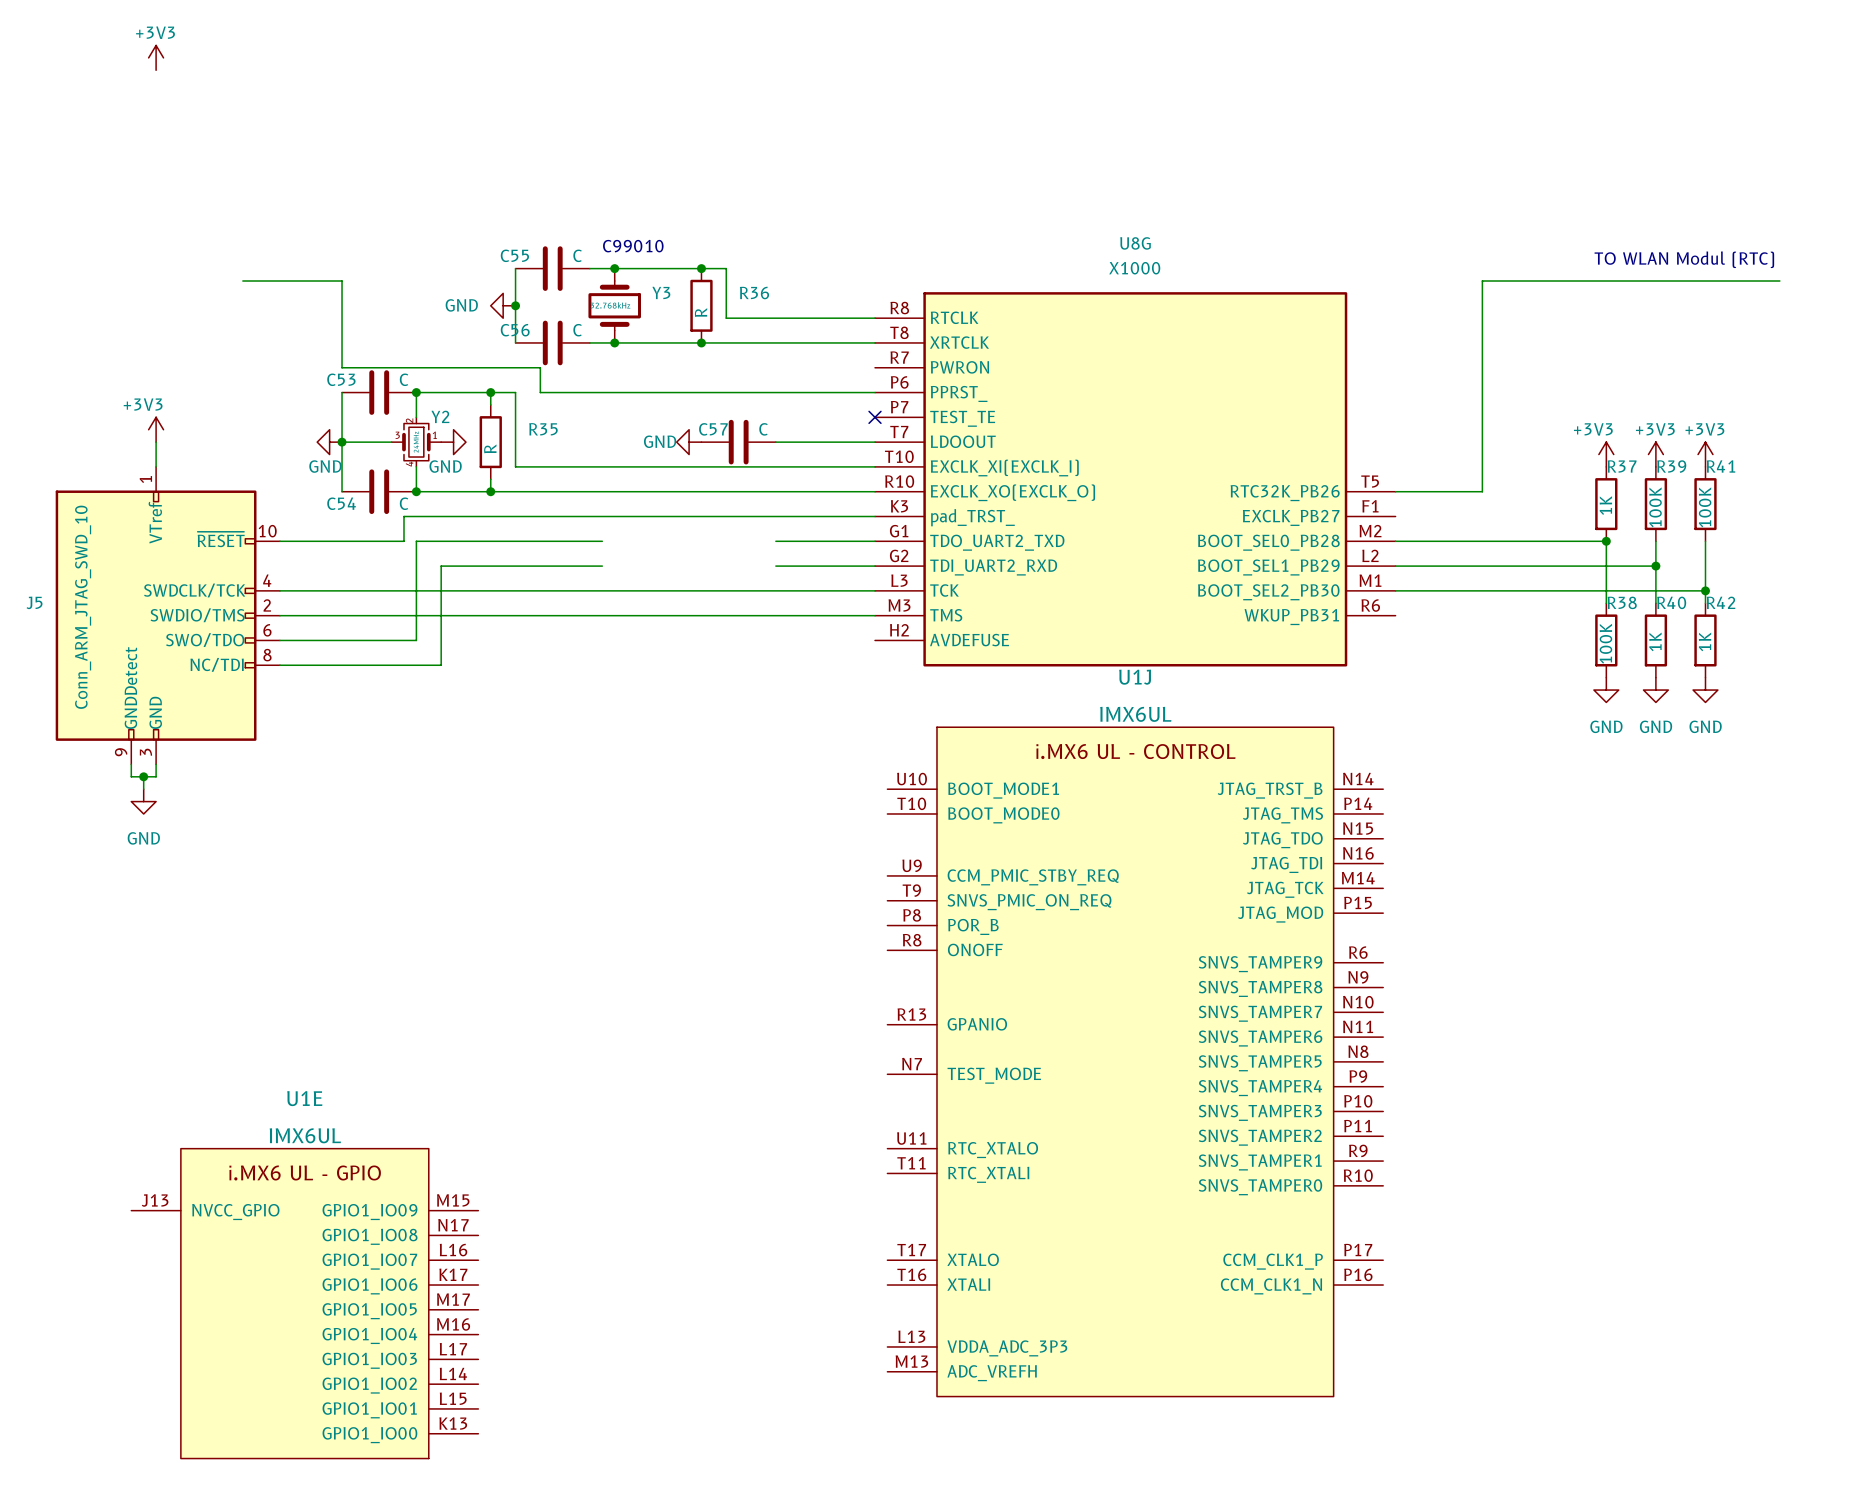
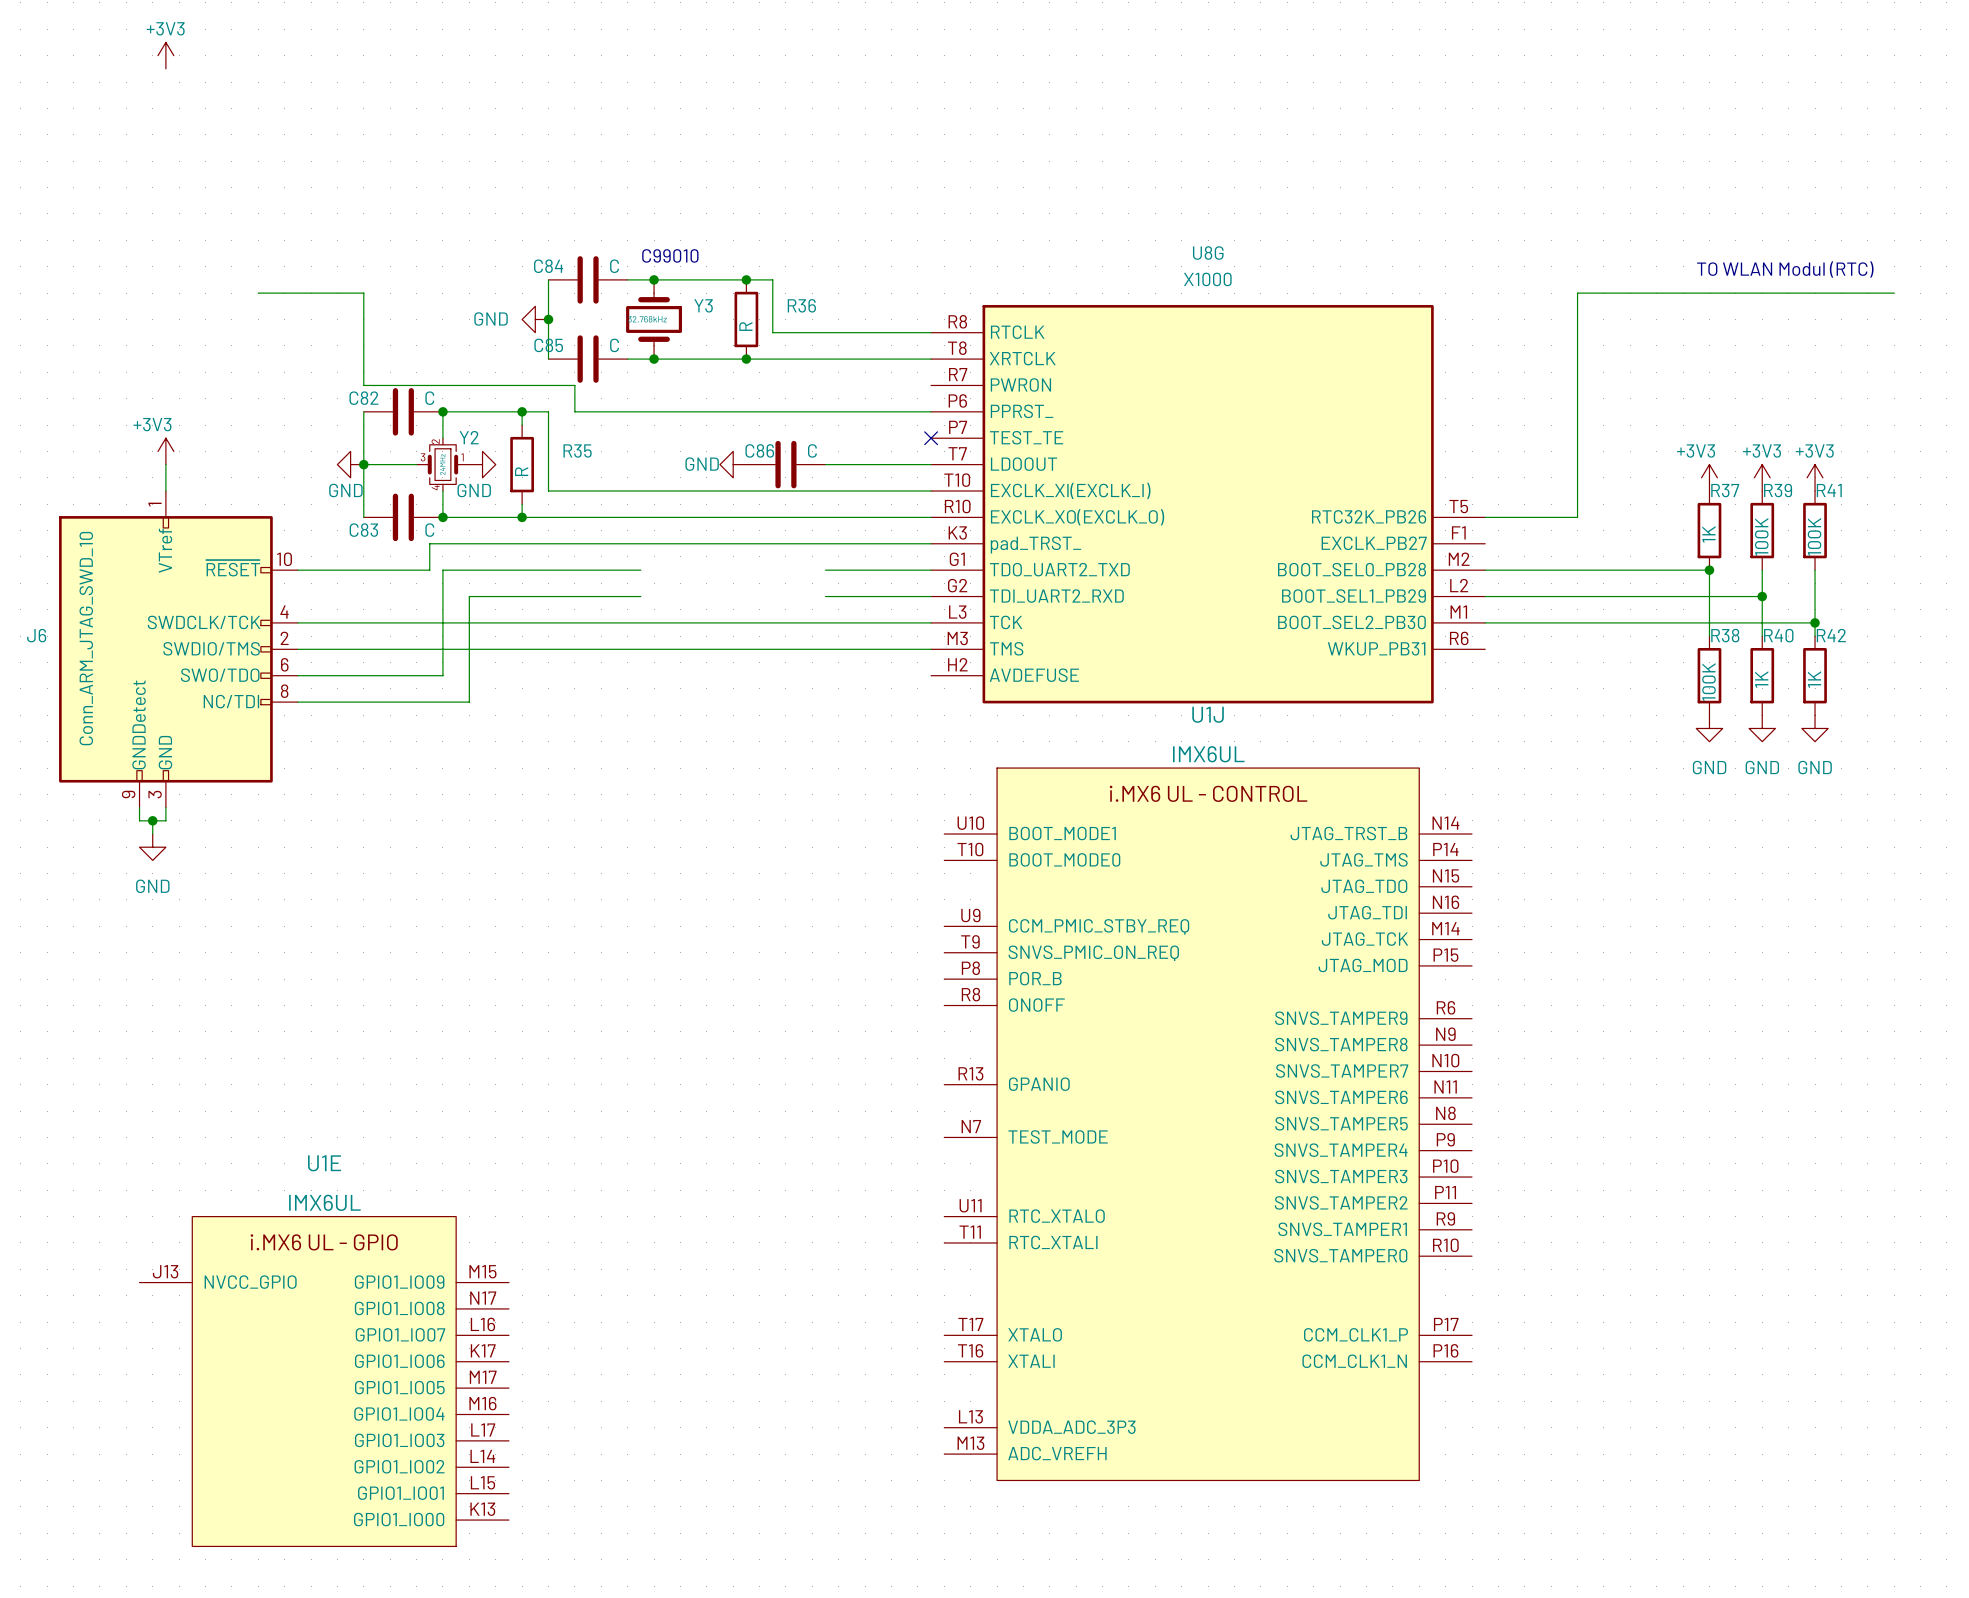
C55 name: C55 (514, 255) -> C84 (548, 266)
C56 name: C56 (515, 330) -> C85 (548, 345)
C53 name: C53 (341, 379) -> C82 (363, 398)
C57 name: C57 (713, 429) -> C86 (759, 450)
C54 name: C54 (341, 503) -> C83 (363, 530)
J5 name: J5 (34, 602) -> J6 (36, 635)

